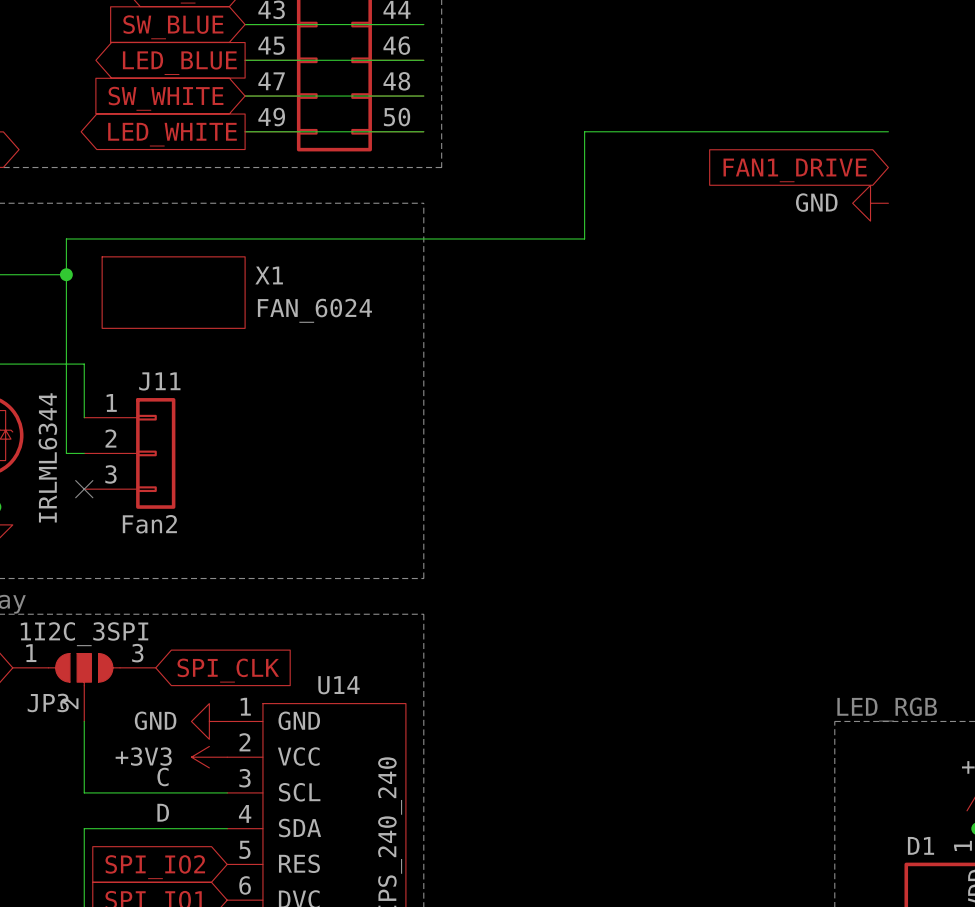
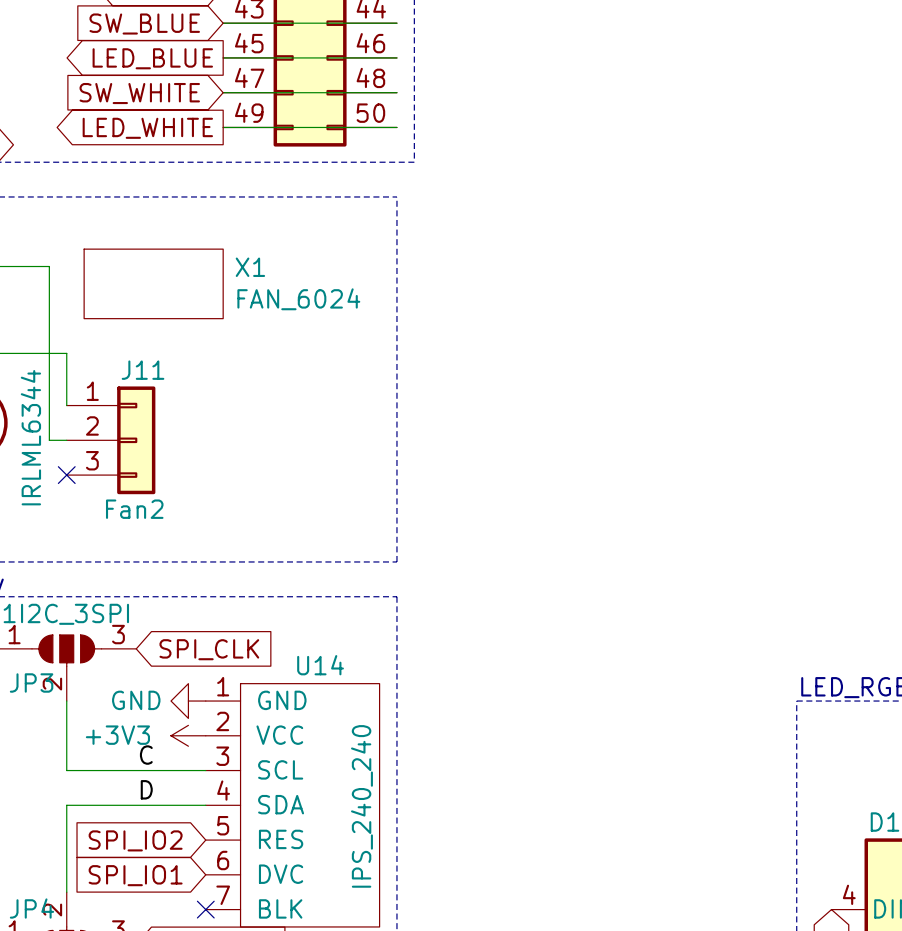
wire: (888, 131) (584, 131) (584, 238) (66, 238) (66, 274) -> none
global label: FAN1_DRIVE (795, 170) -> none
power symbol: GND (870, 203) -> none
junction: (66, 274) -> none

